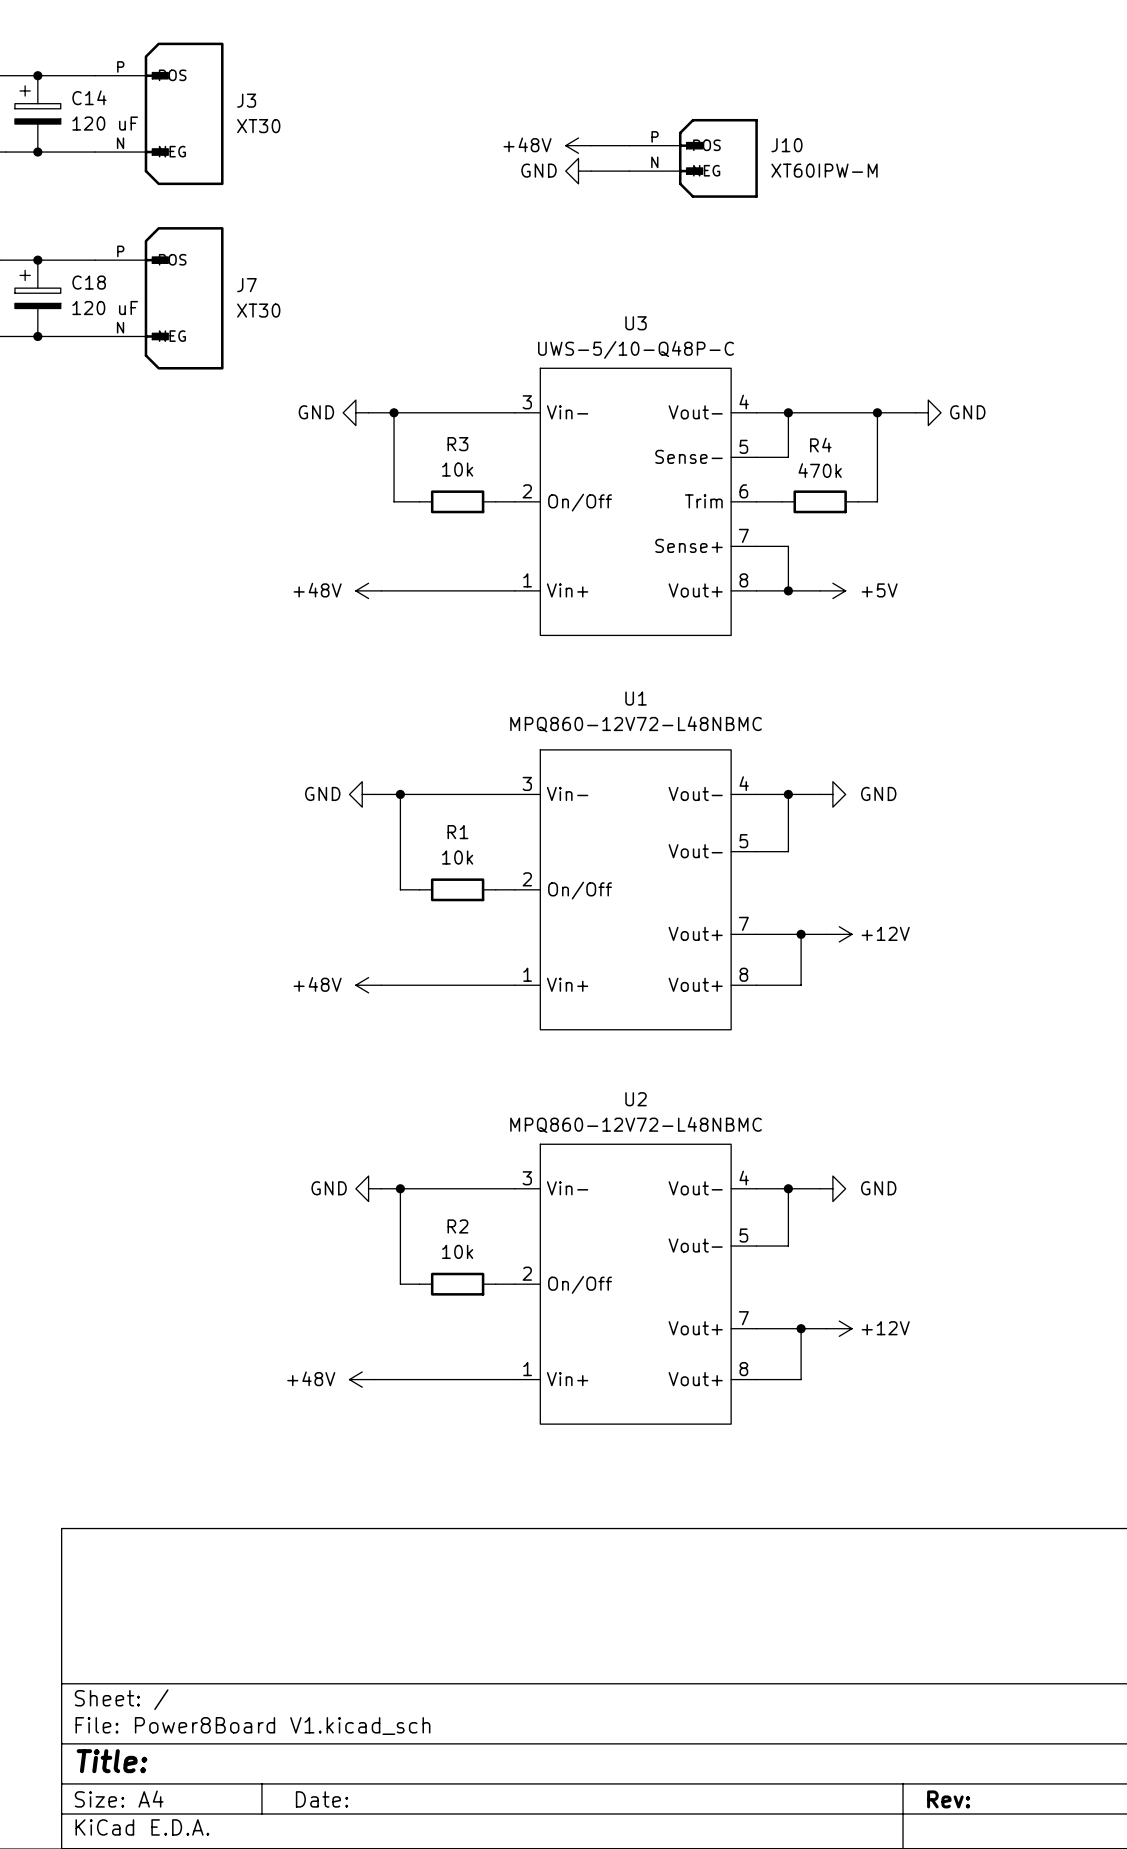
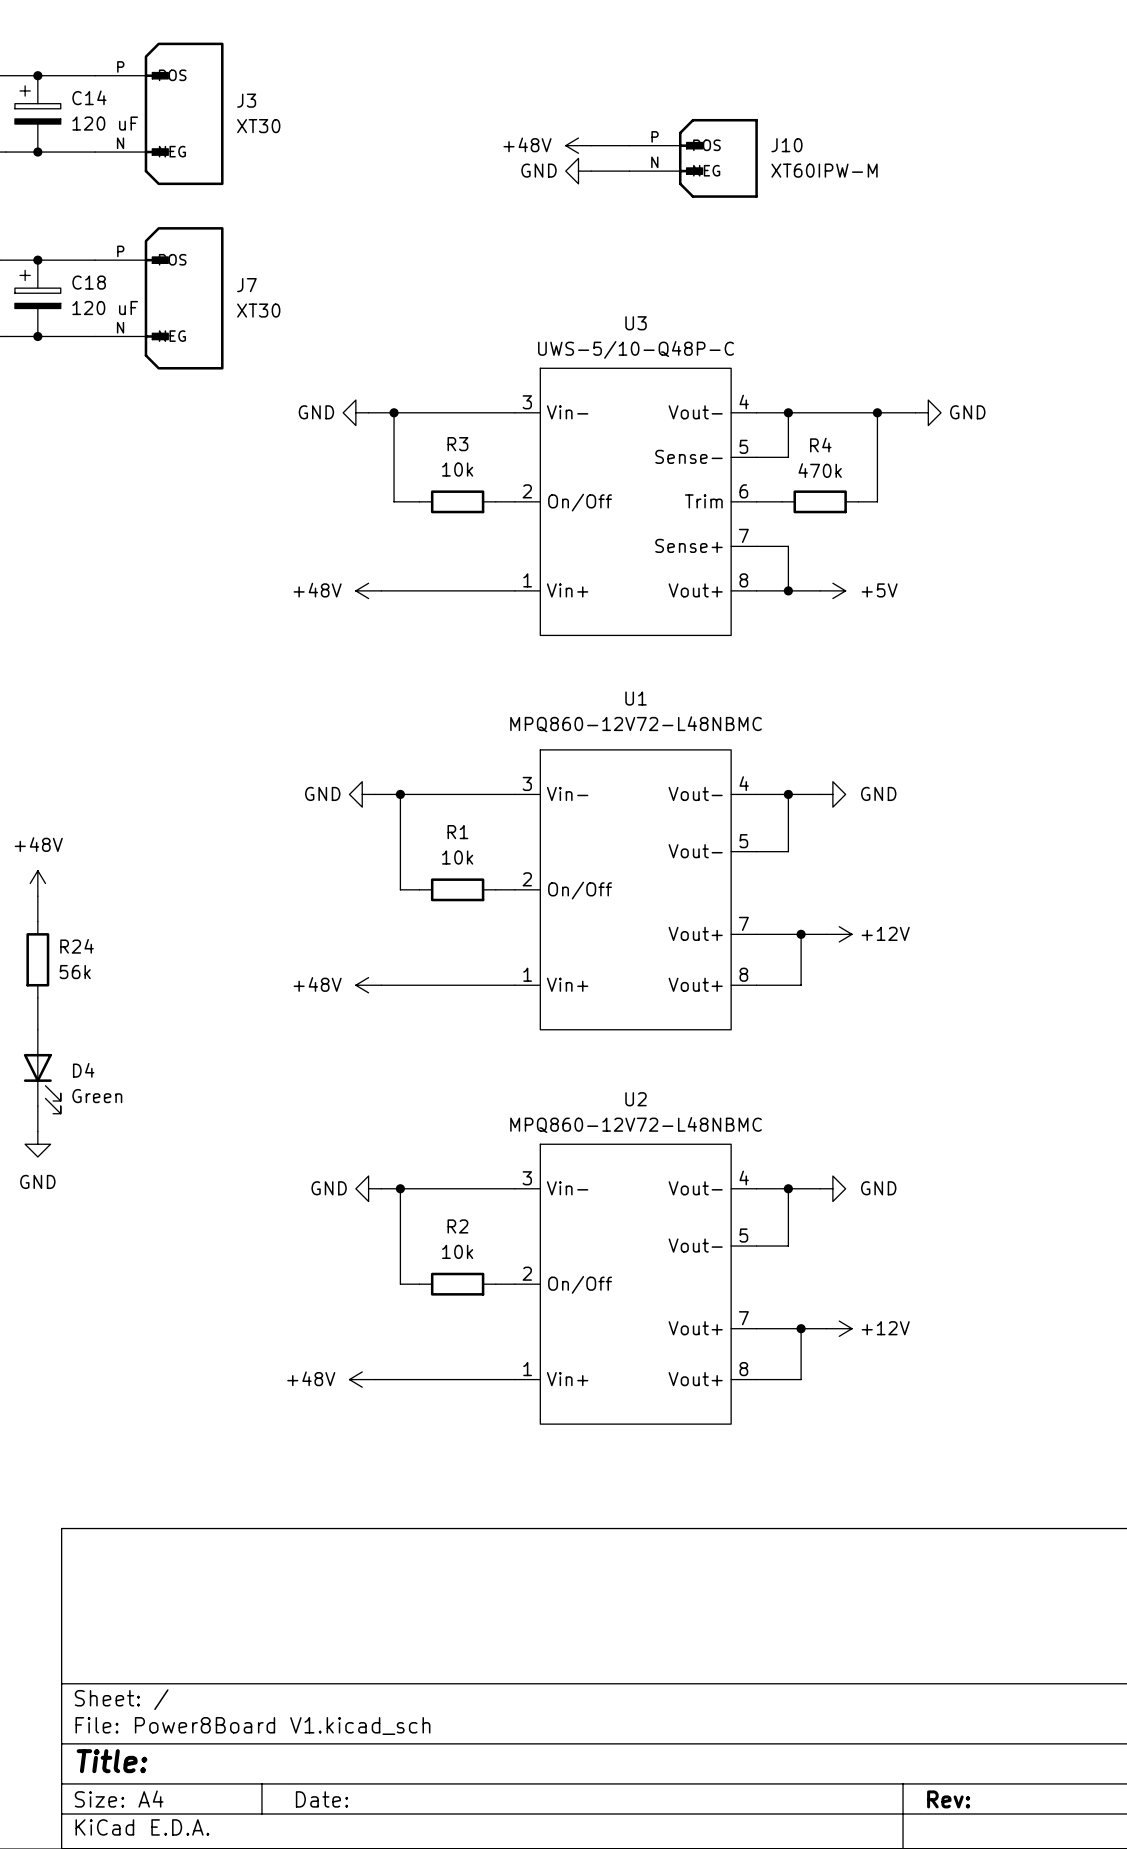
power symbol: none -> +48V (37, 883)
wire: none -> (37, 896) (37, 921)
R24: none -> 56k (37, 959)
wire: none -> (37, 997) (37, 1029)
D4: none -> Green (42, 1071)
wire: none -> (37, 1106) (37, 1131)
power symbol: none -> GND (37, 1144)

